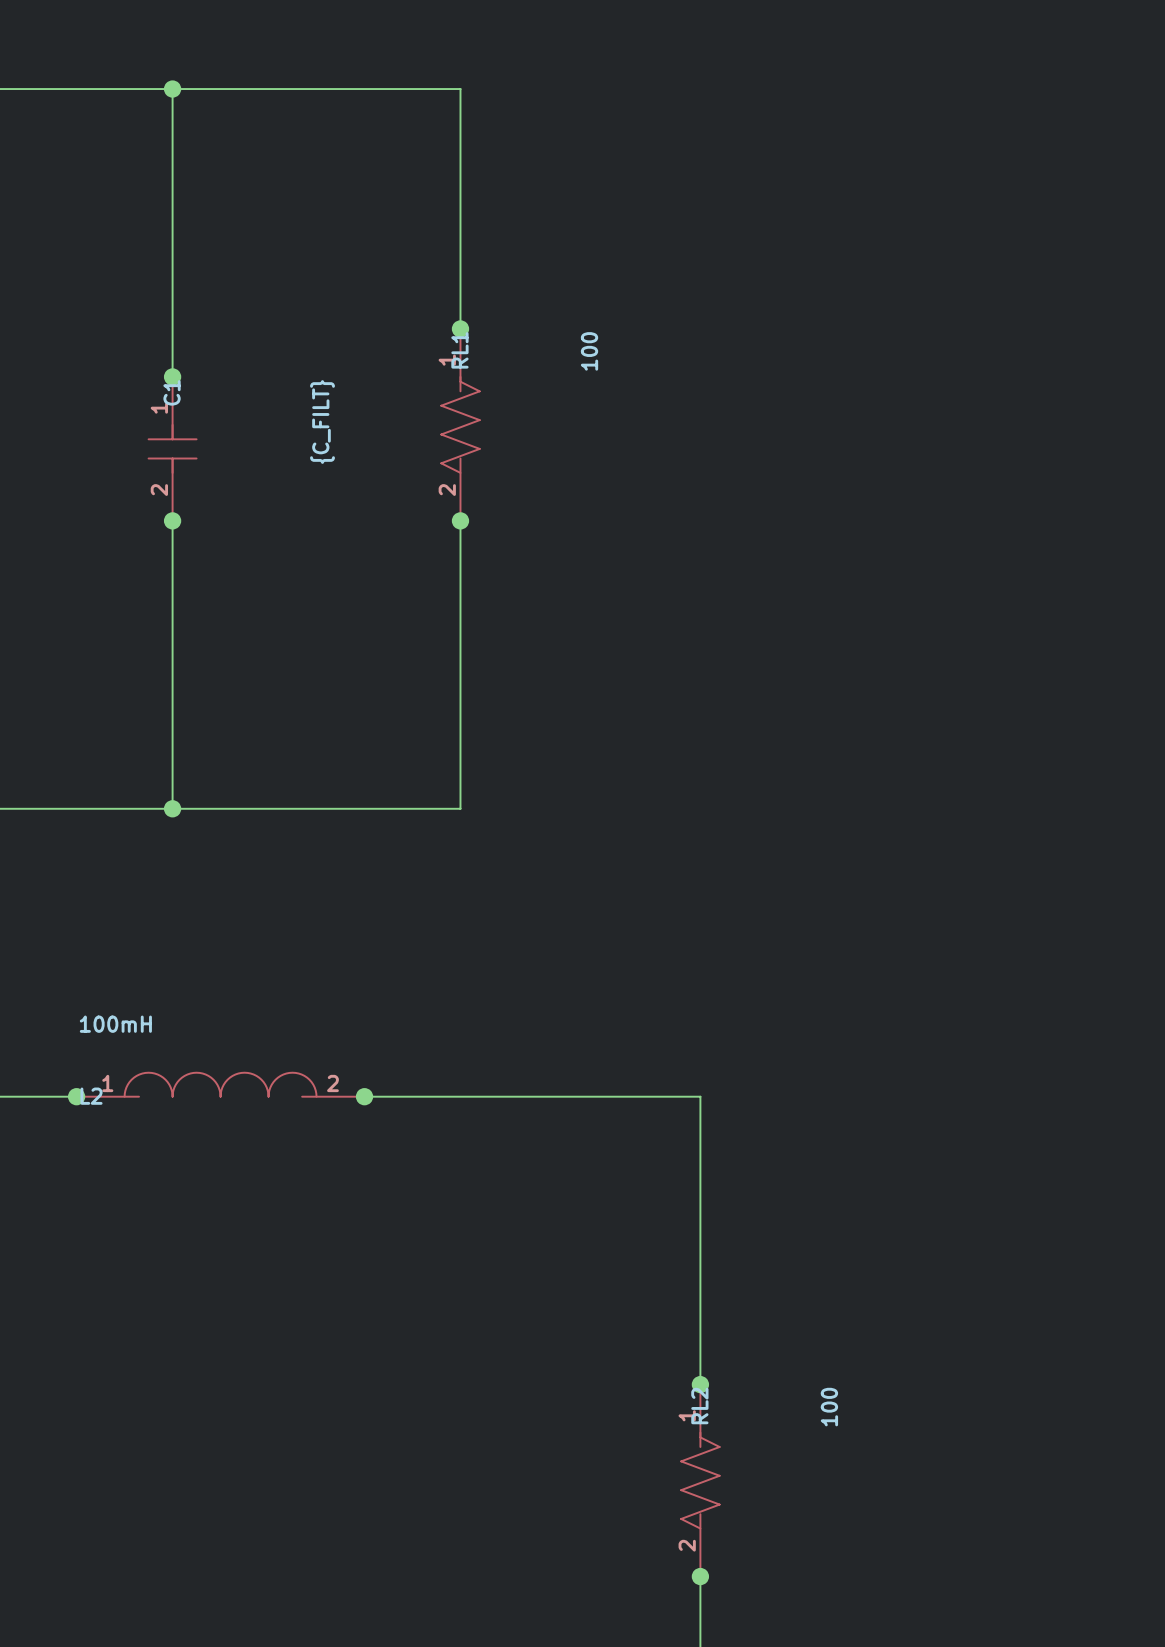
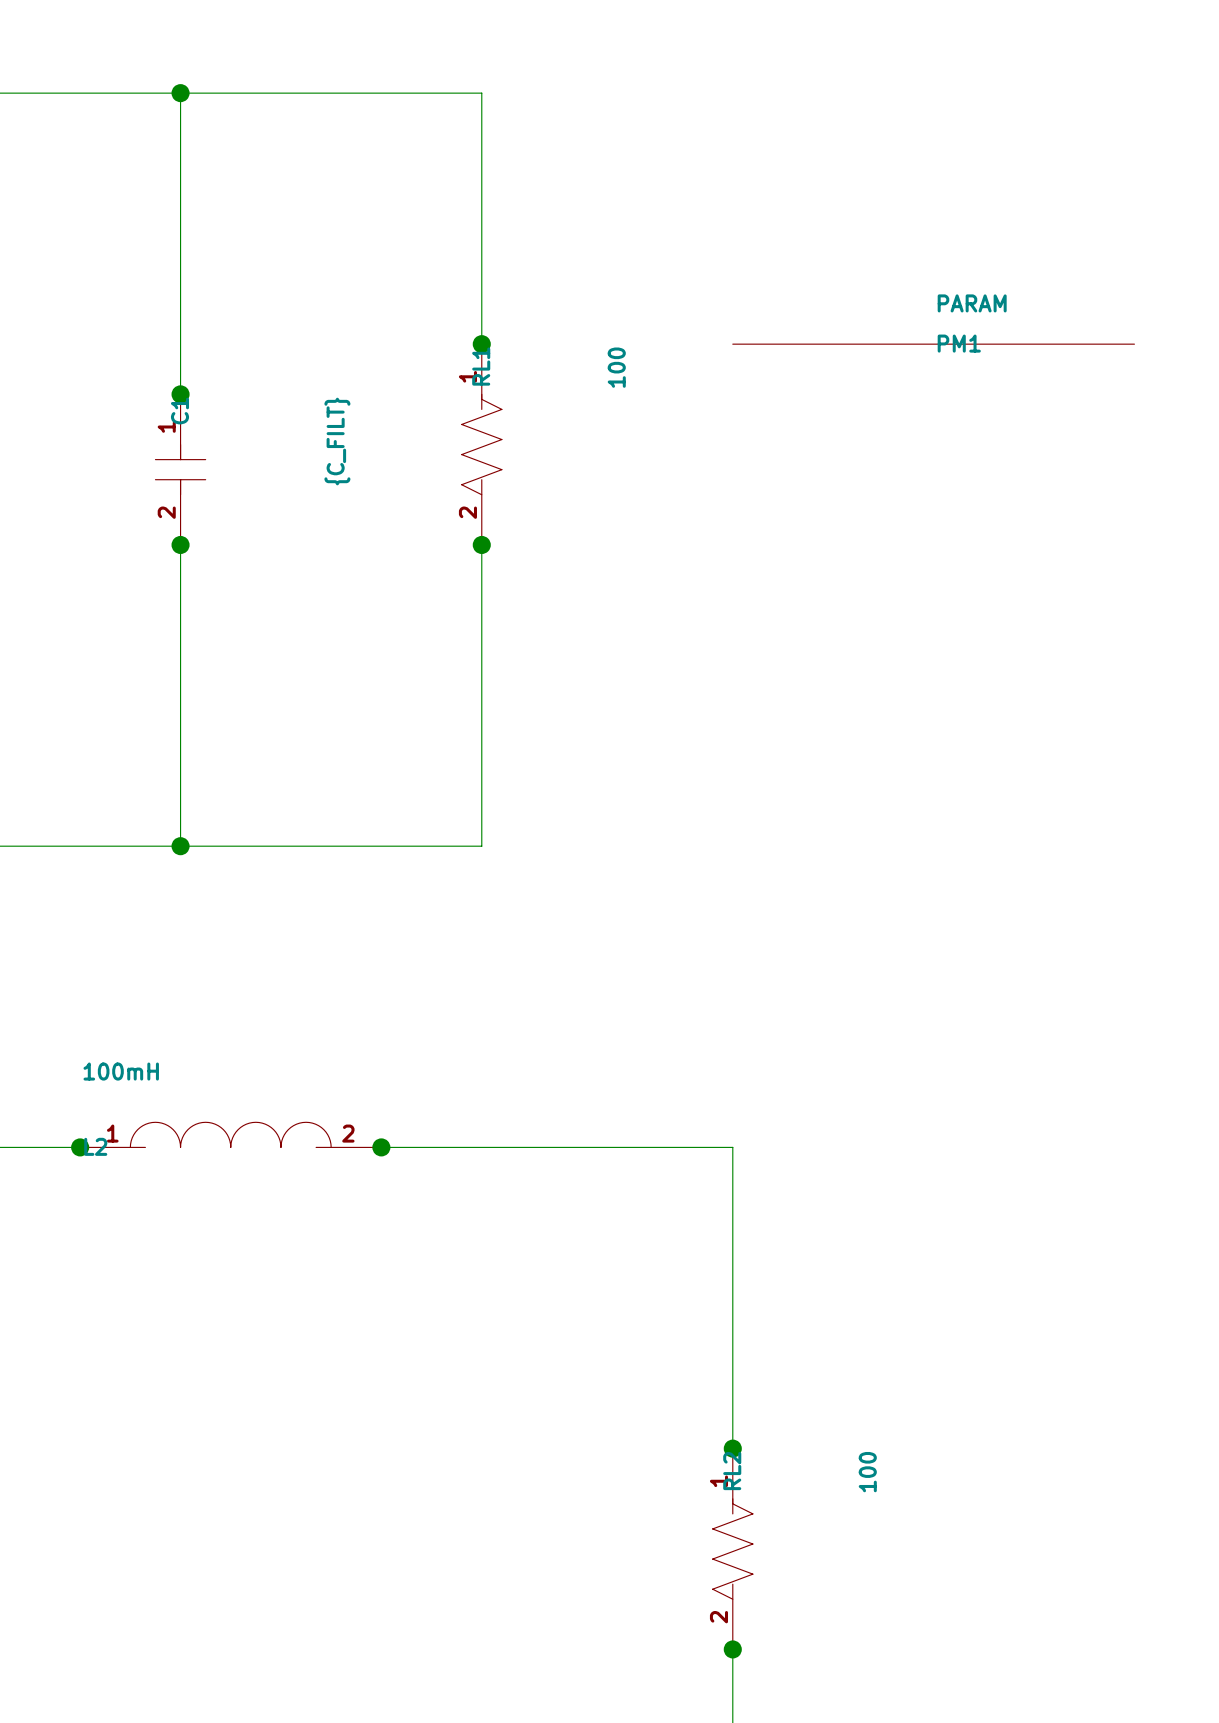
PM1: none -> PARAM (933, 344)

